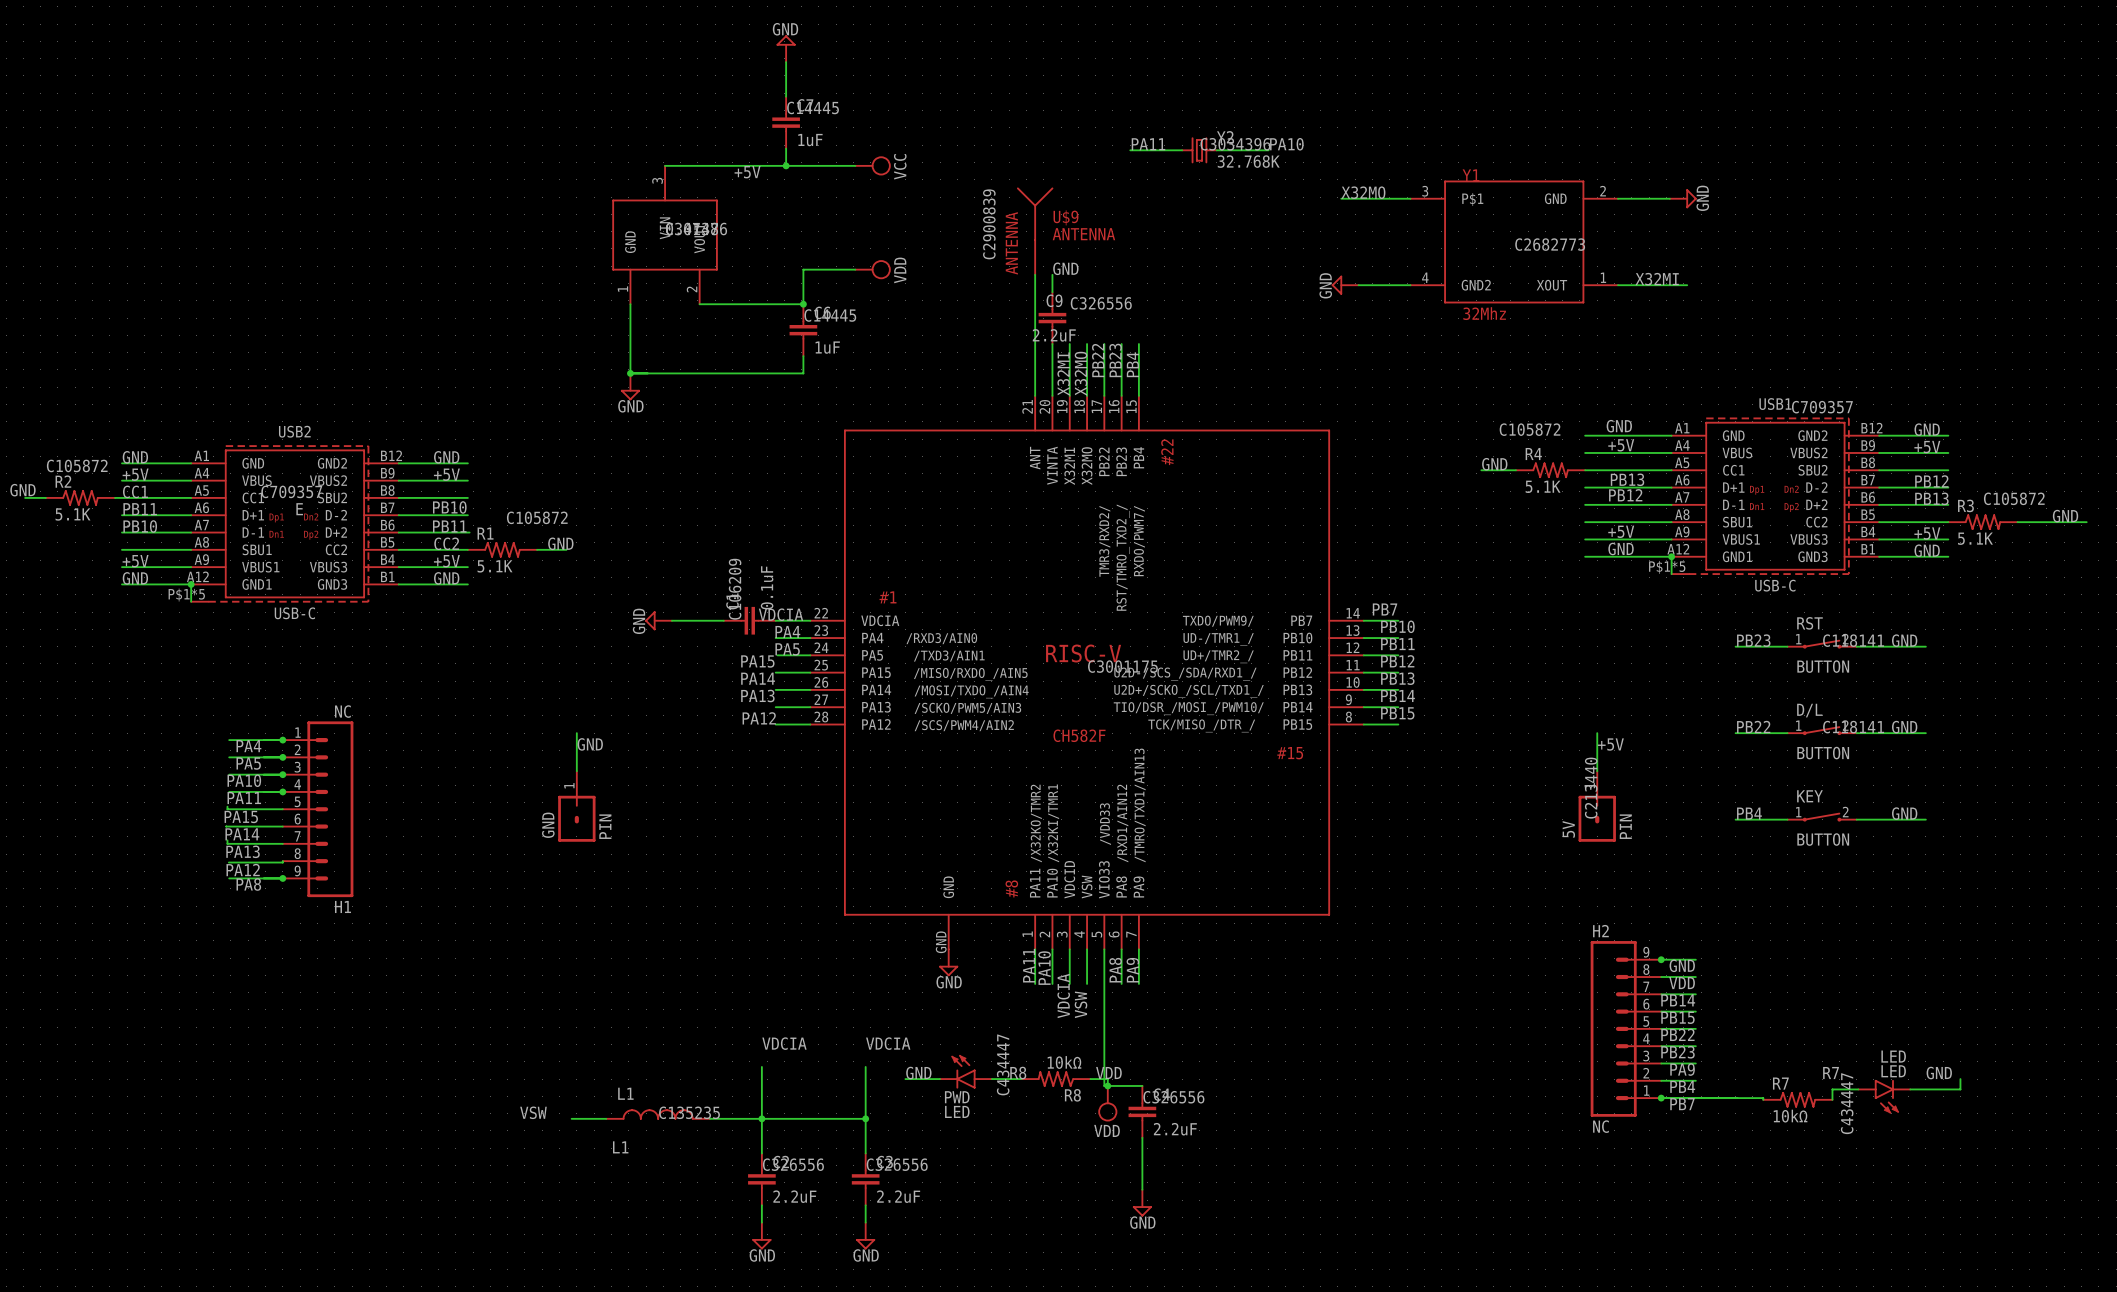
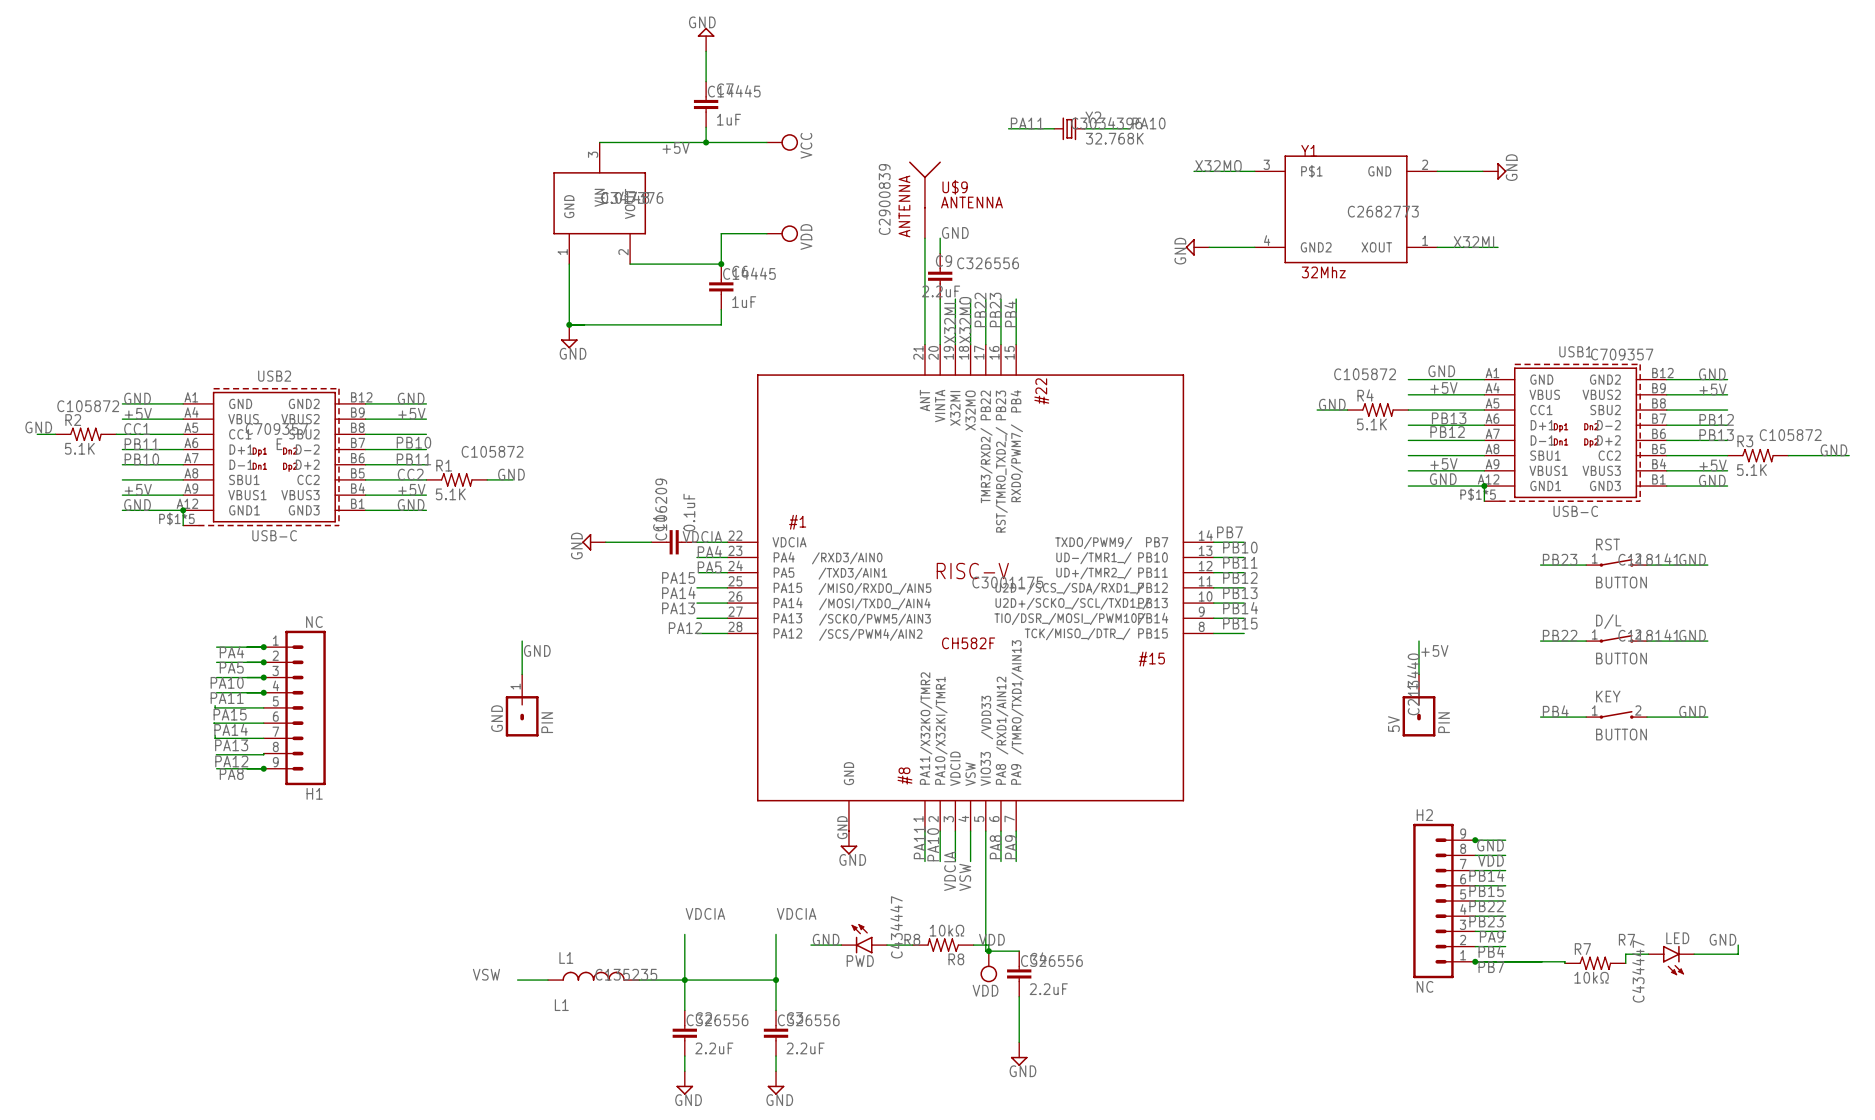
LED value: LED (1893, 1056) -> none
PWD value: LED (957, 1111) -> none

